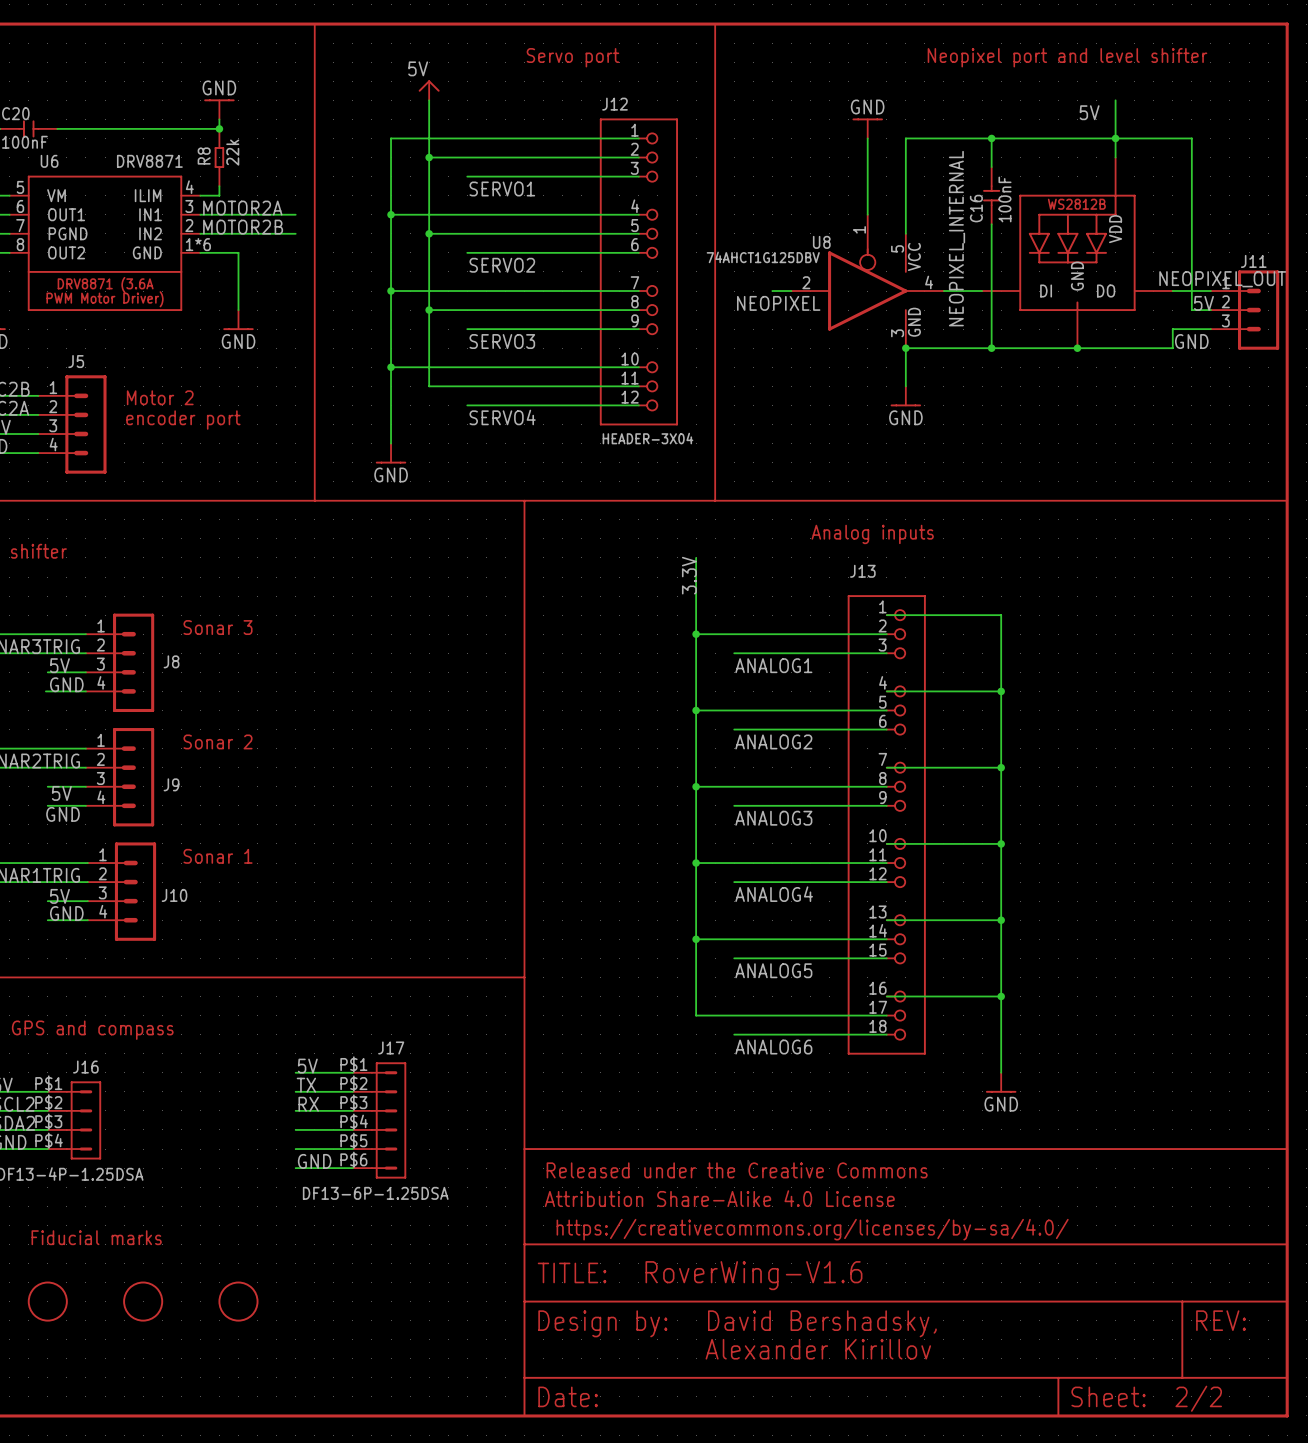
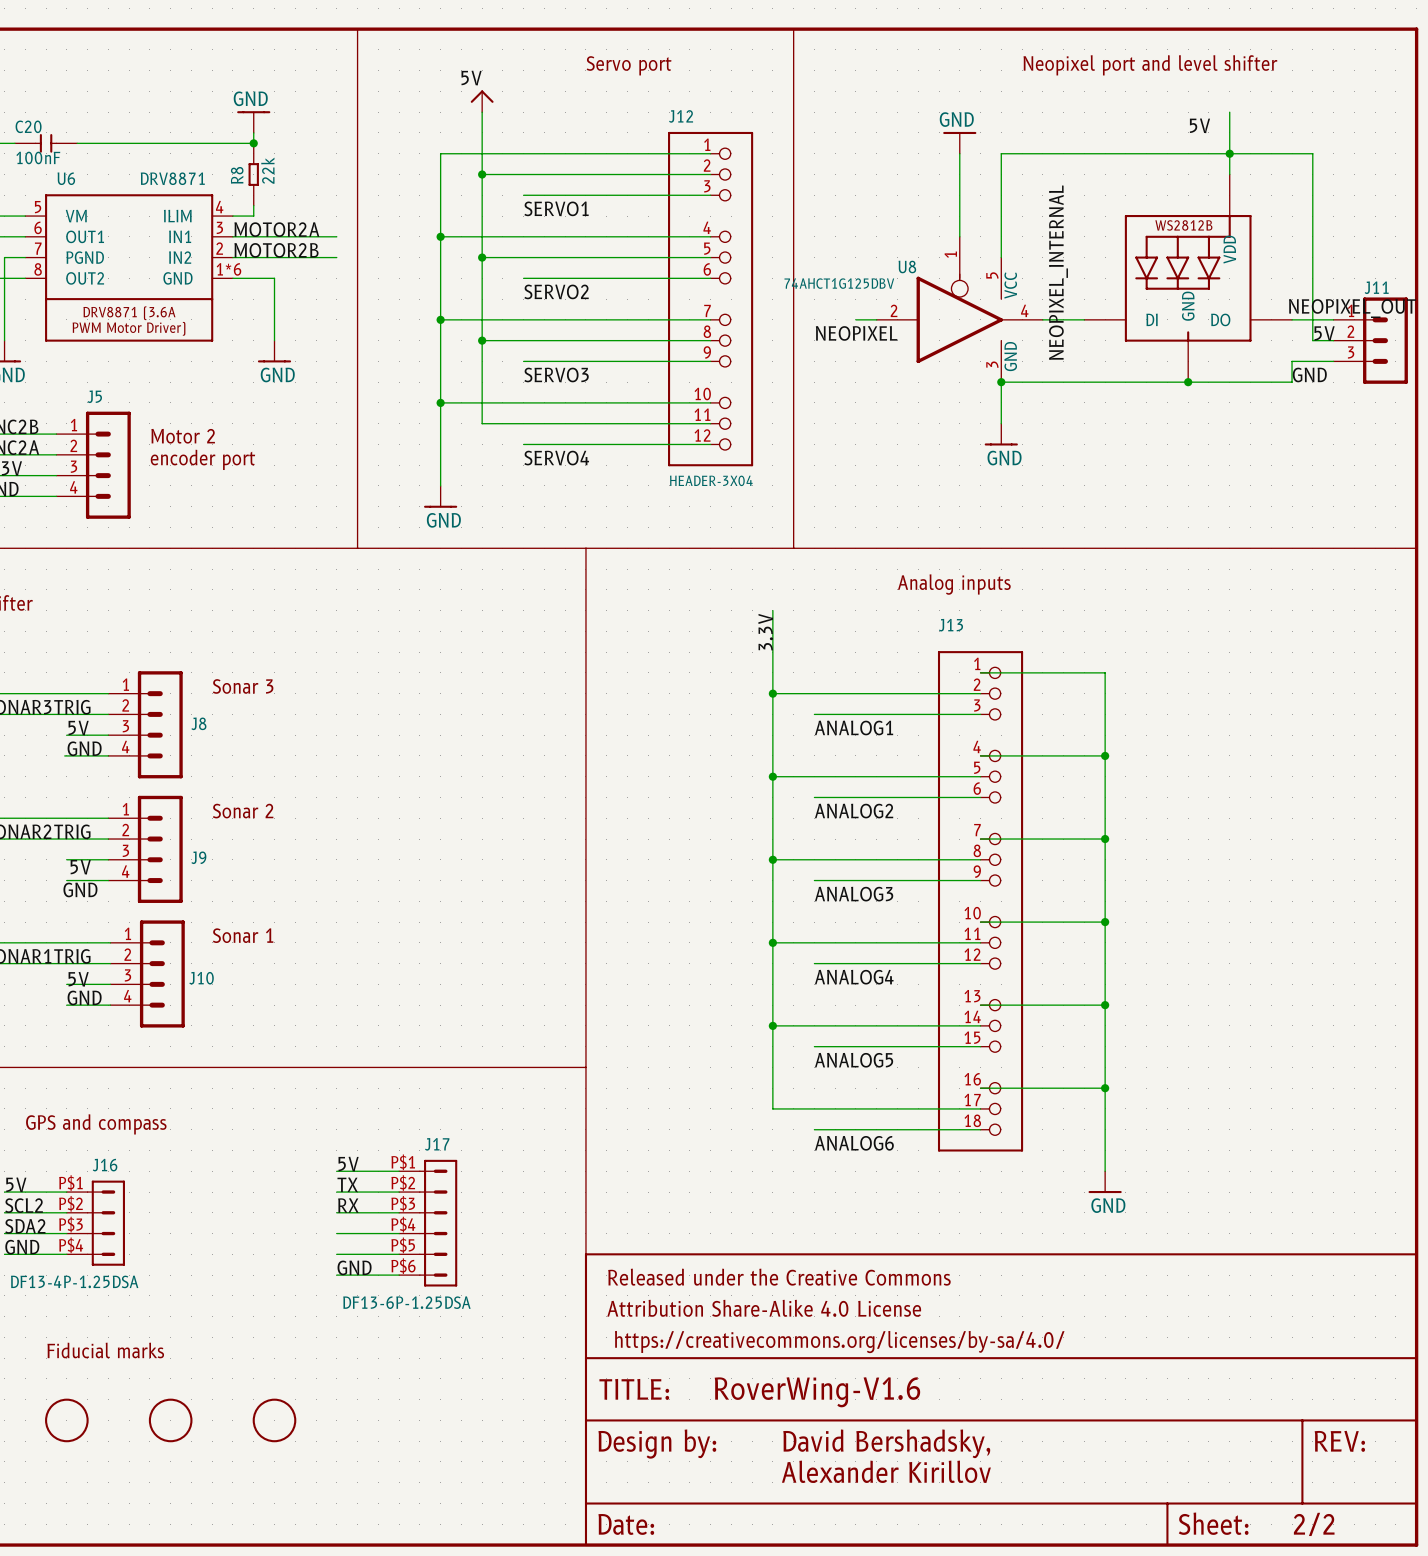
wire: (991, 138) (991, 167) -> none
junction: (991, 138) -> none
C16: 100nF (991, 195) -> none
wire: (991, 224) (991, 348) -> none
junction: (991, 348) -> none

